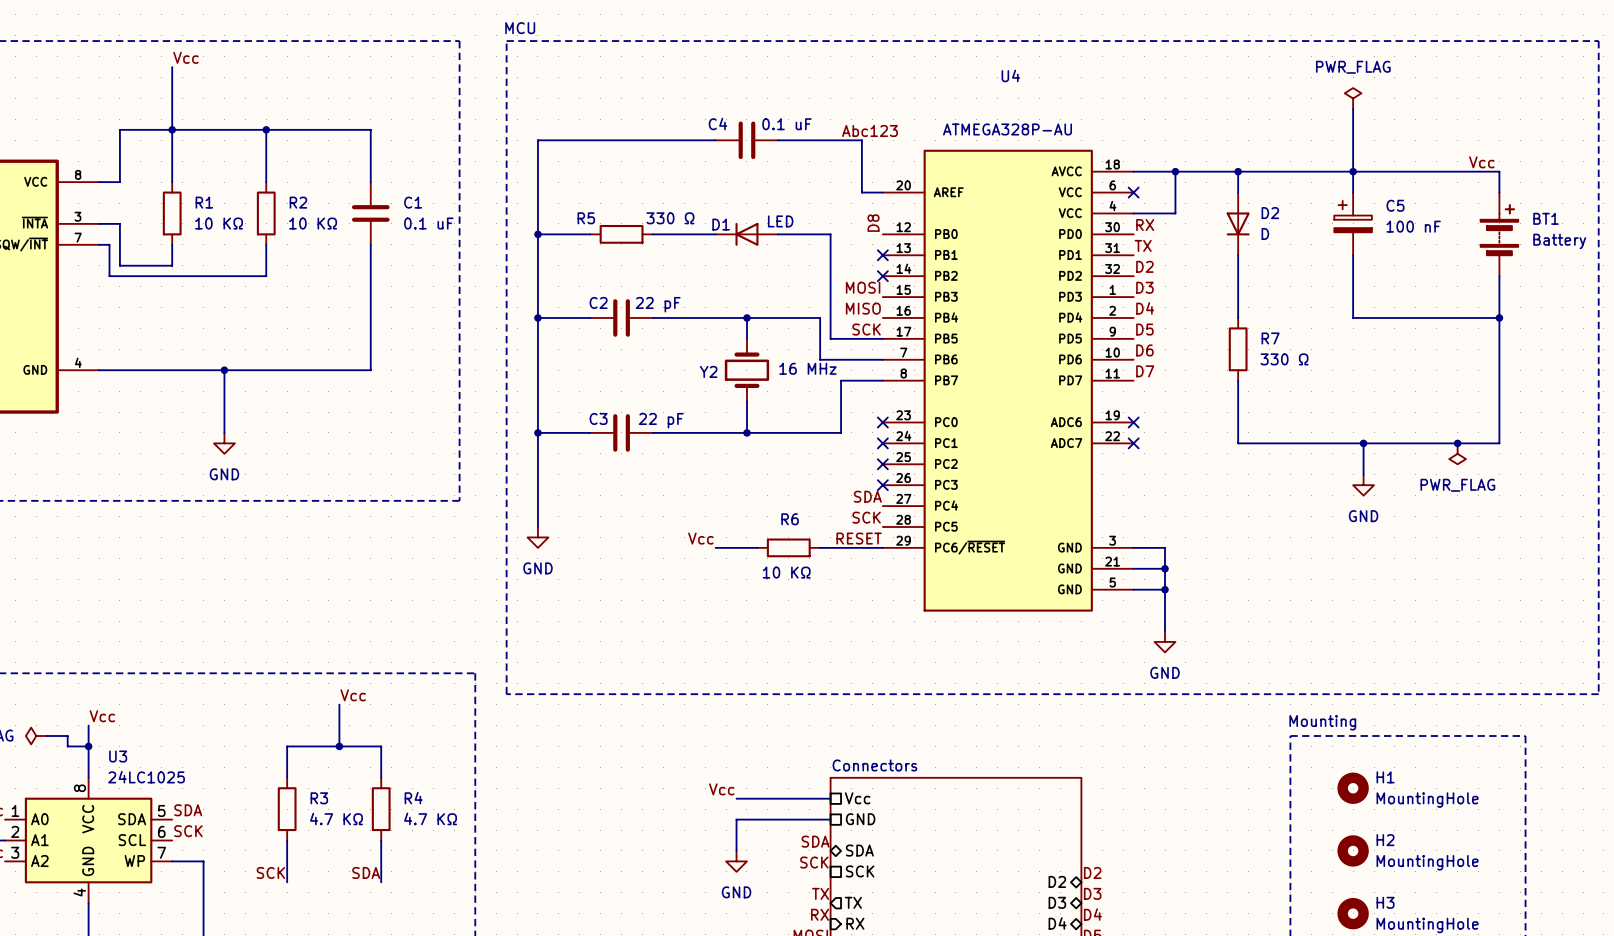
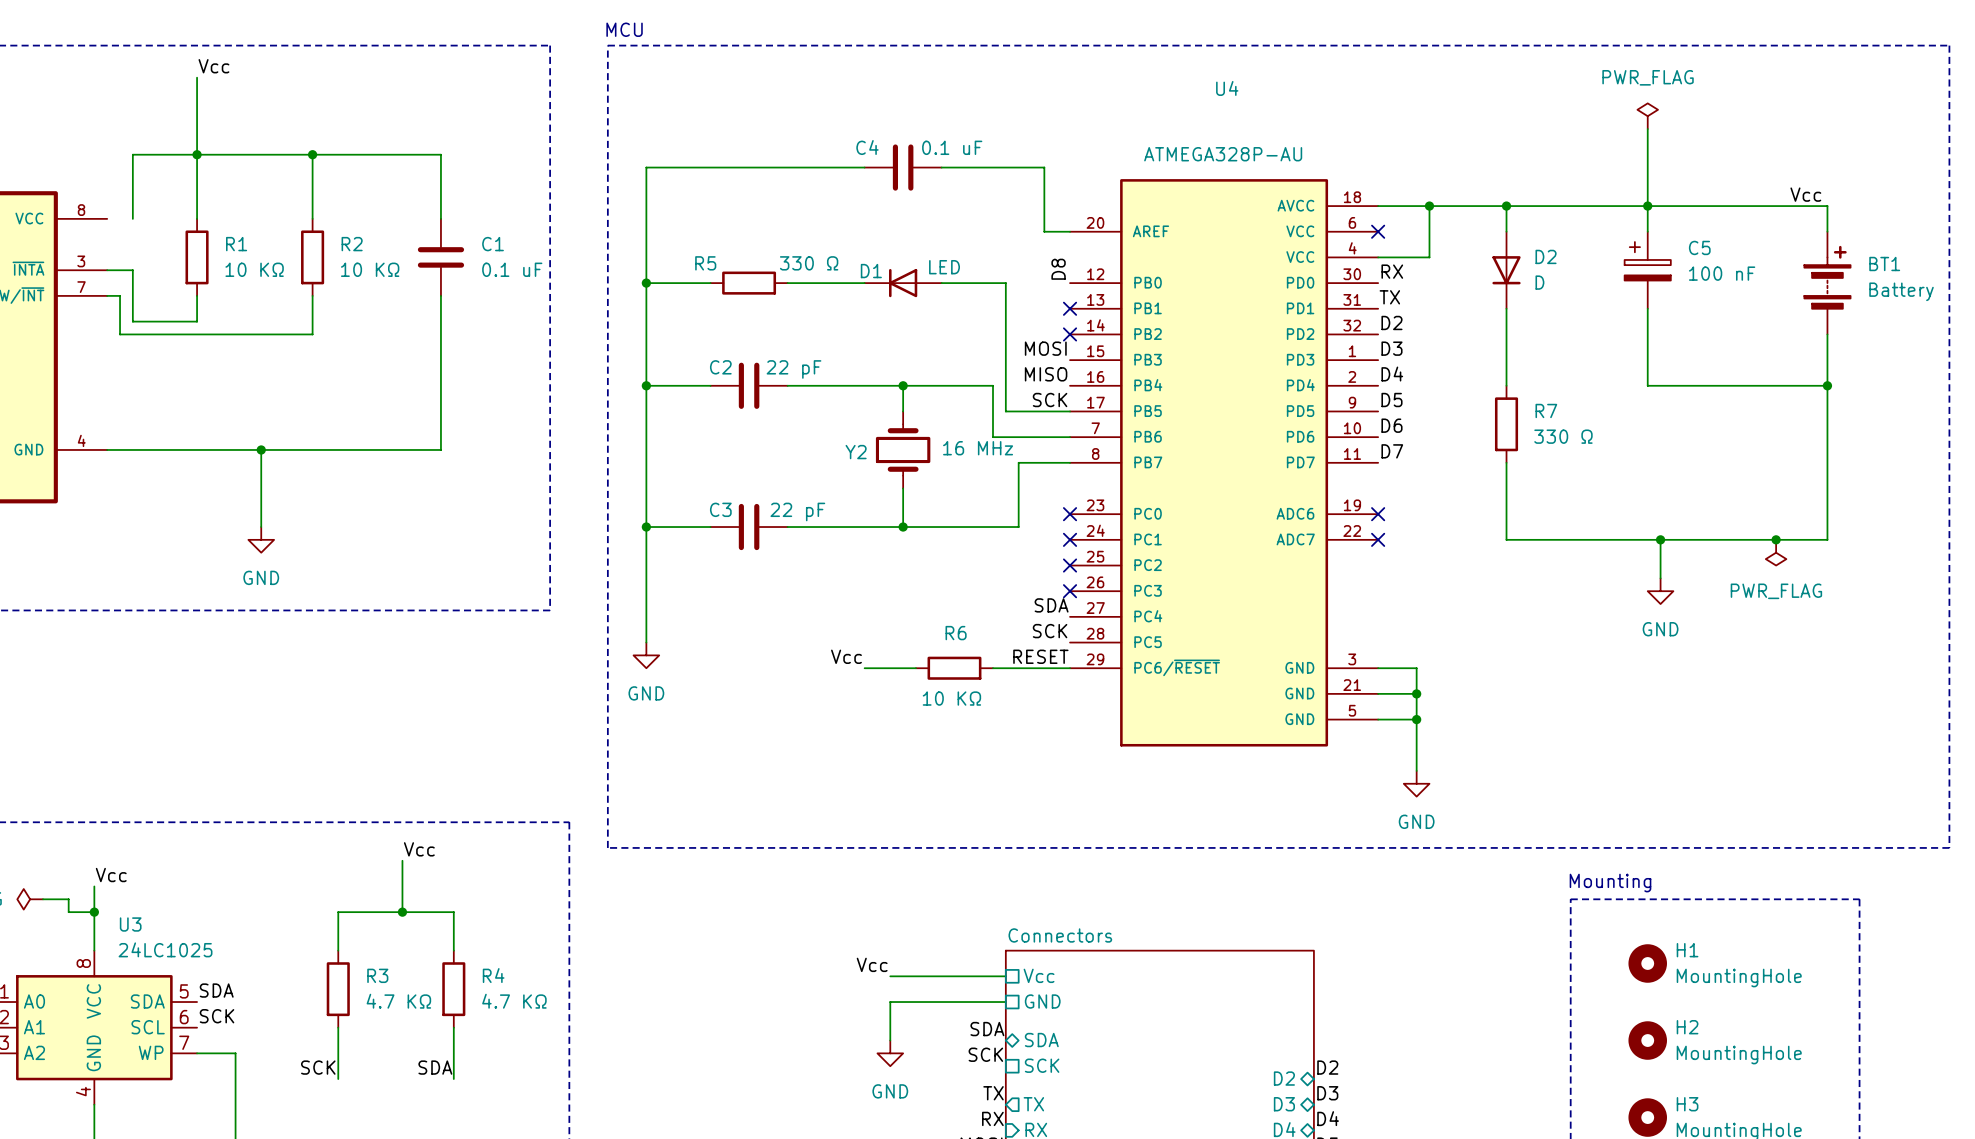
label: Abc123 (869, 130) -> none
wire: (99, 182) (119, 182) -> none

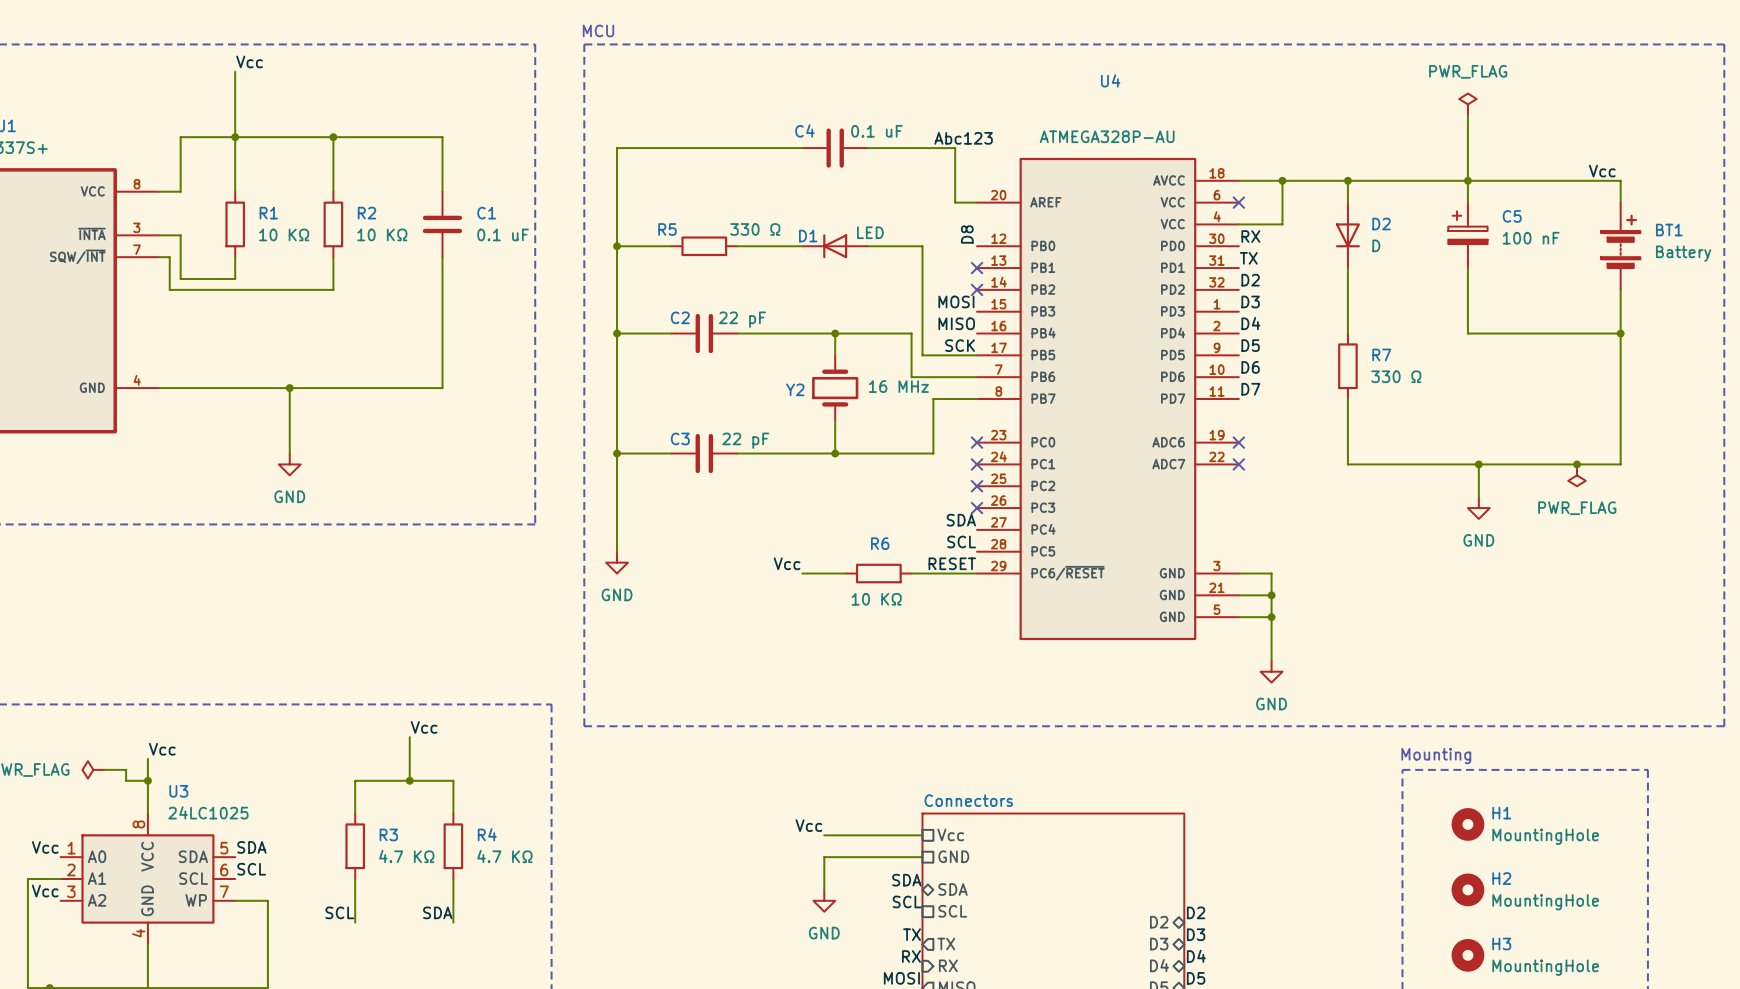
label: none -> Abc123 (963, 138)
wire: none -> (158, 191) (180, 191)
label: SCK (1050, 631) -> SCL (961, 541)
label: SCK (217, 1016) -> SCL (251, 869)
label: SCK (985, 1054) -> SCL (907, 901)
sheet pin: SCK (1042, 1065) -> SCL (952, 911)
label: SCK (318, 1067) -> SCL (339, 912)

